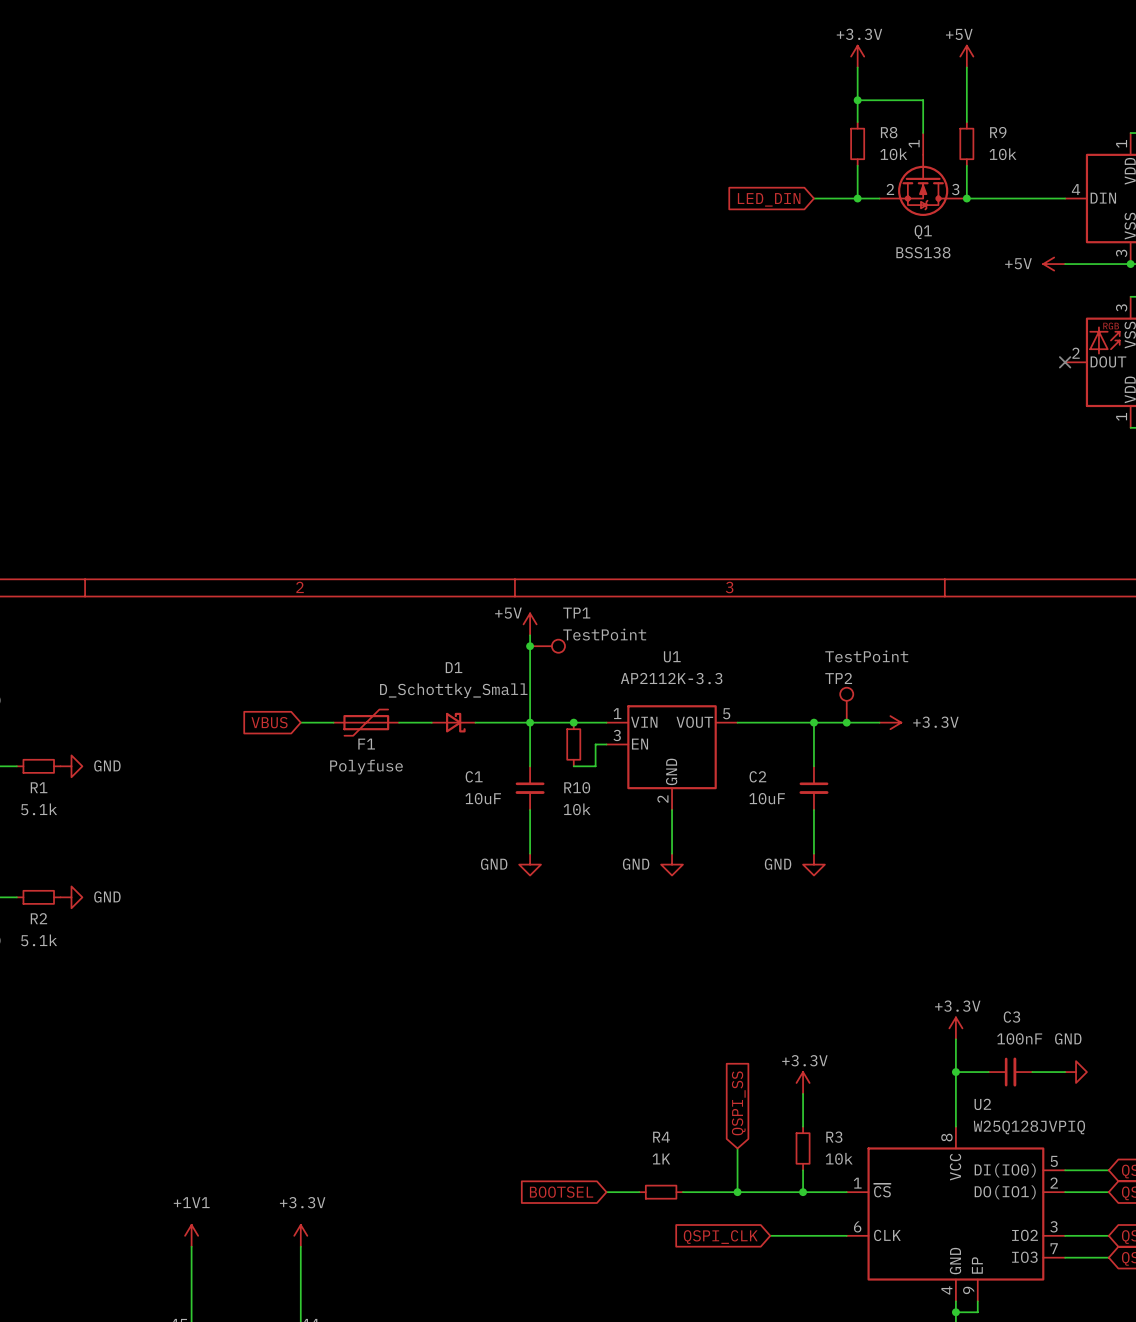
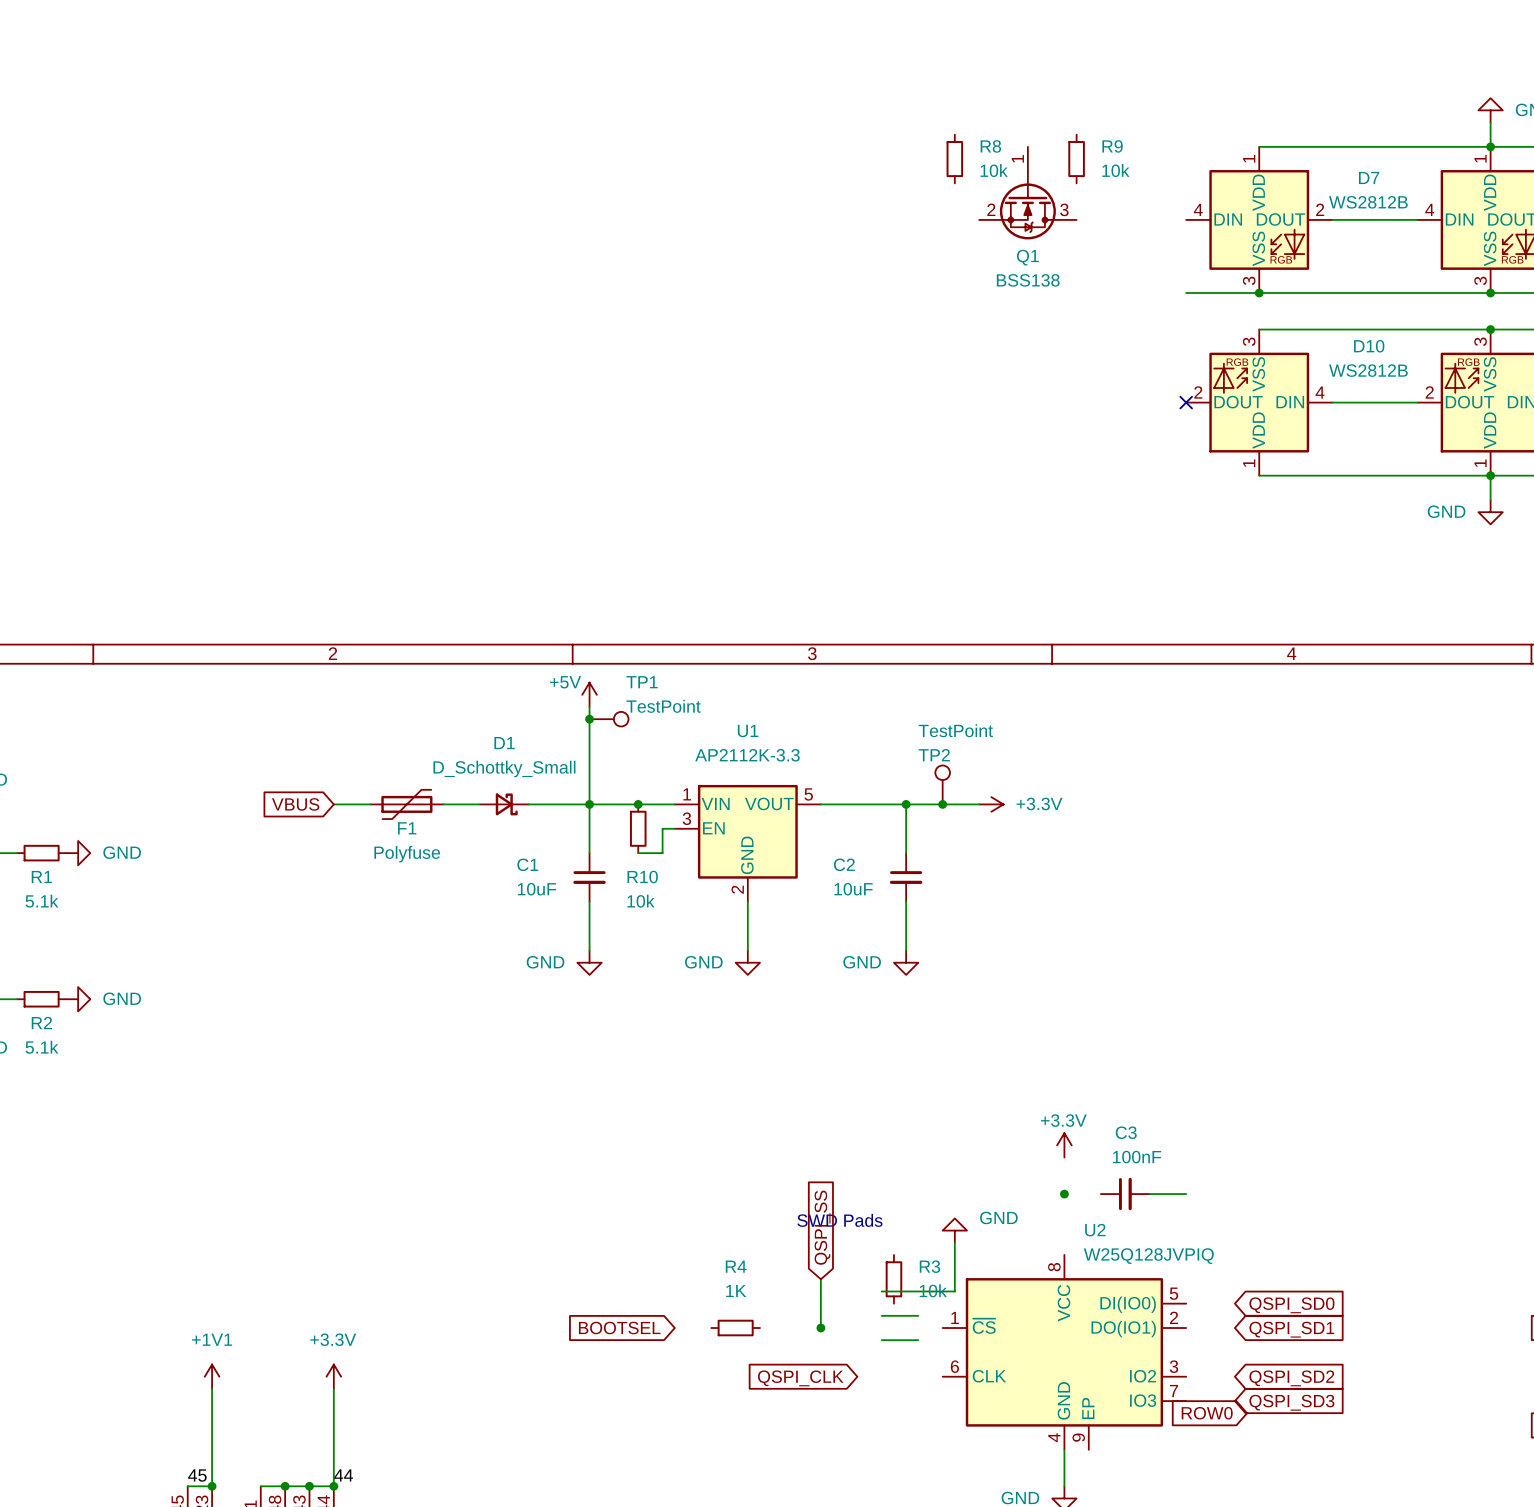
power symbol: +3.3V (857, 56) -> none
power symbol: +5V (966, 56) -> none
wire: (857, 67) (857, 122) -> none
wire: (966, 67) (966, 122) -> none
wire: (857, 100) (923, 100) (923, 133) -> none
junction: (857, 100) -> none
wire: (857, 165) (857, 198) -> none
wire: (966, 165) (966, 198) (1065, 198) -> none
wire: (813, 198) (879, 198) -> none
junction: (857, 198) -> none
junction: (966, 198) -> none
global label: LED_DIN (769, 199) -> none
power symbol: +5V (1054, 264) -> none
wire: (955, 1039) (955, 1126) -> none
wire: (955, 1072) (988, 1072) -> (881, 1340) (918, 1340)
power symbol: GND (1076, 1072) -> none
power symbol: +3.3V (803, 1082) -> none
wire: (803, 1093) (803, 1126) -> none
text: none -> SWD Pads (839, 1220)
power symbol: none -> GND (954, 1230)
wire: none -> (954, 1242) (954, 1291) (881, 1291)
wire: (803, 1170) (803, 1192) -> none
wire: (1065, 1170) (1108, 1170) -> none
wire: (606, 1192) (639, 1192) -> (881, 1315) (918, 1315)
wire: (682, 1192) (846, 1192) -> none
junction: (803, 1192) -> none
wire: (1065, 1192) (1108, 1192) -> none
wire: (770, 1235) (846, 1235) -> none
wire: (1065, 1235) (1108, 1235) -> none
global label: none -> ROW0 (1207, 1413)
wire: (977, 1301) (977, 1312) (955, 1312) -> none
junction: (955, 1312) -> none

